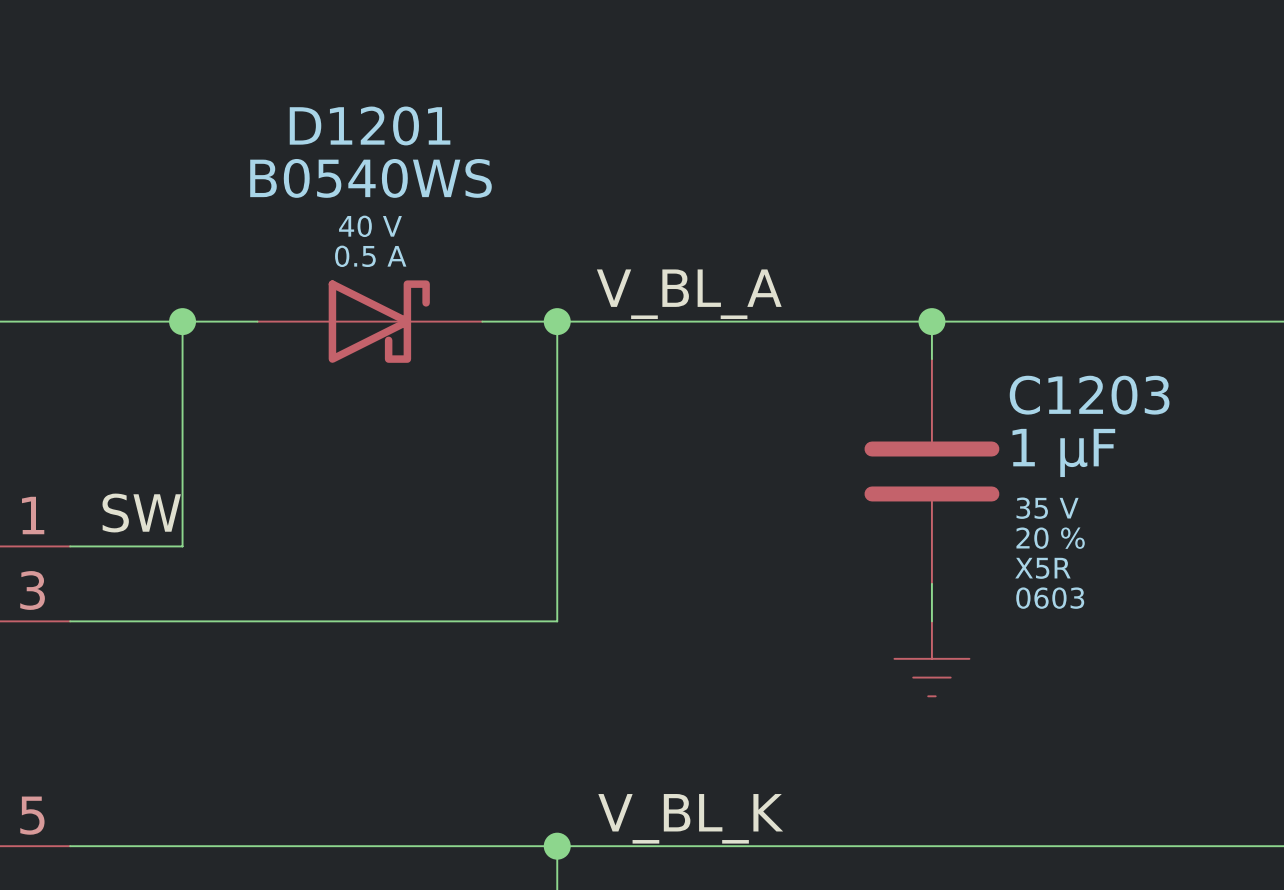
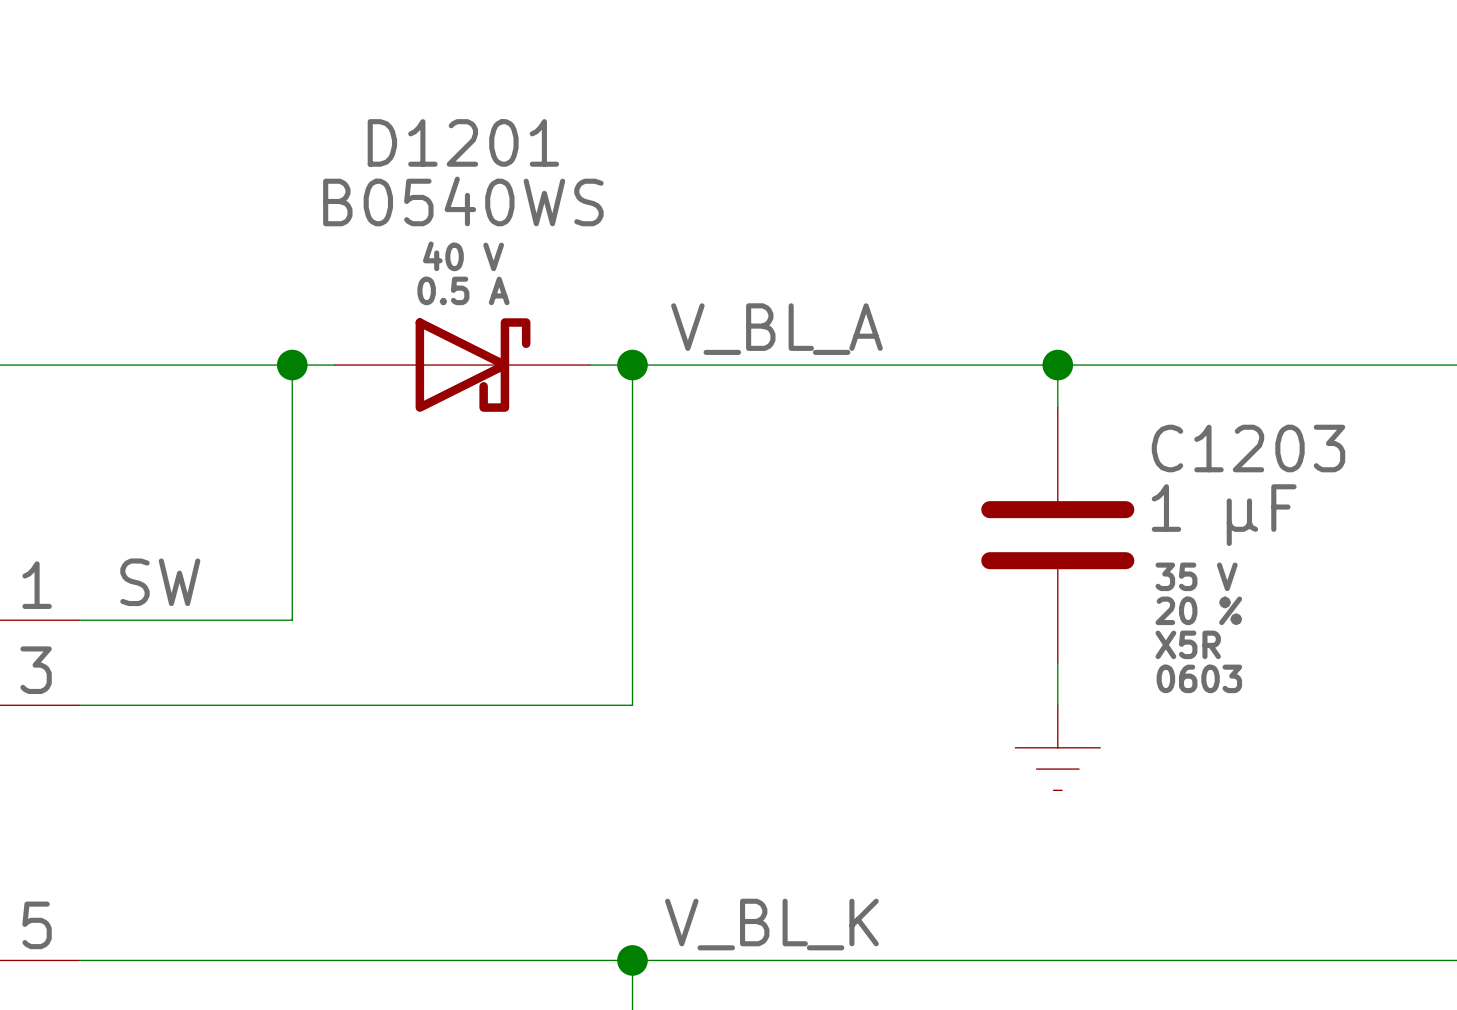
wire: (182, 321) (182, 546) -> (334, 365) (292, 365) (292, 620) (207, 620)
junction position: (182, 321) -> (292, 365)
D1201 position: (369, 321) -> (462, 365)

